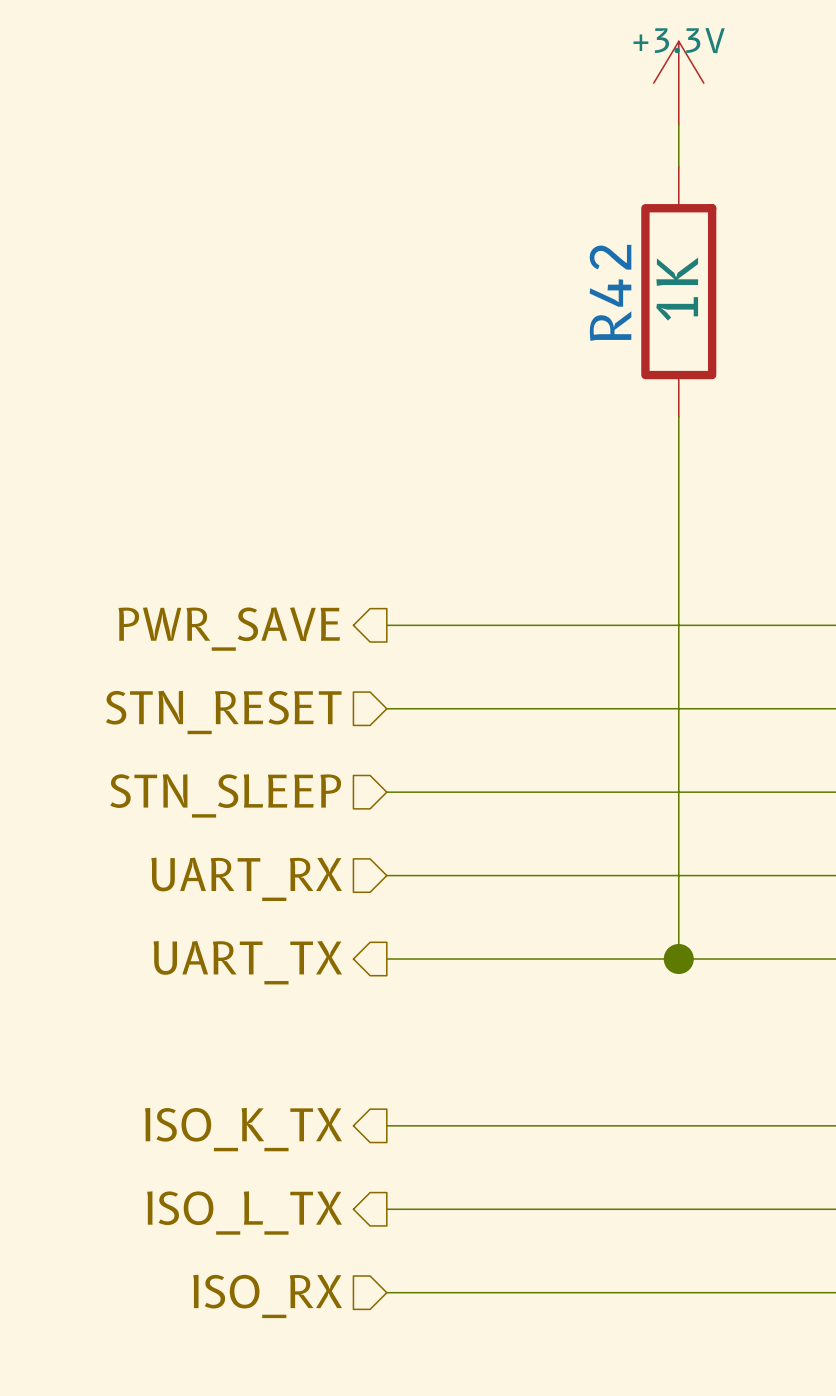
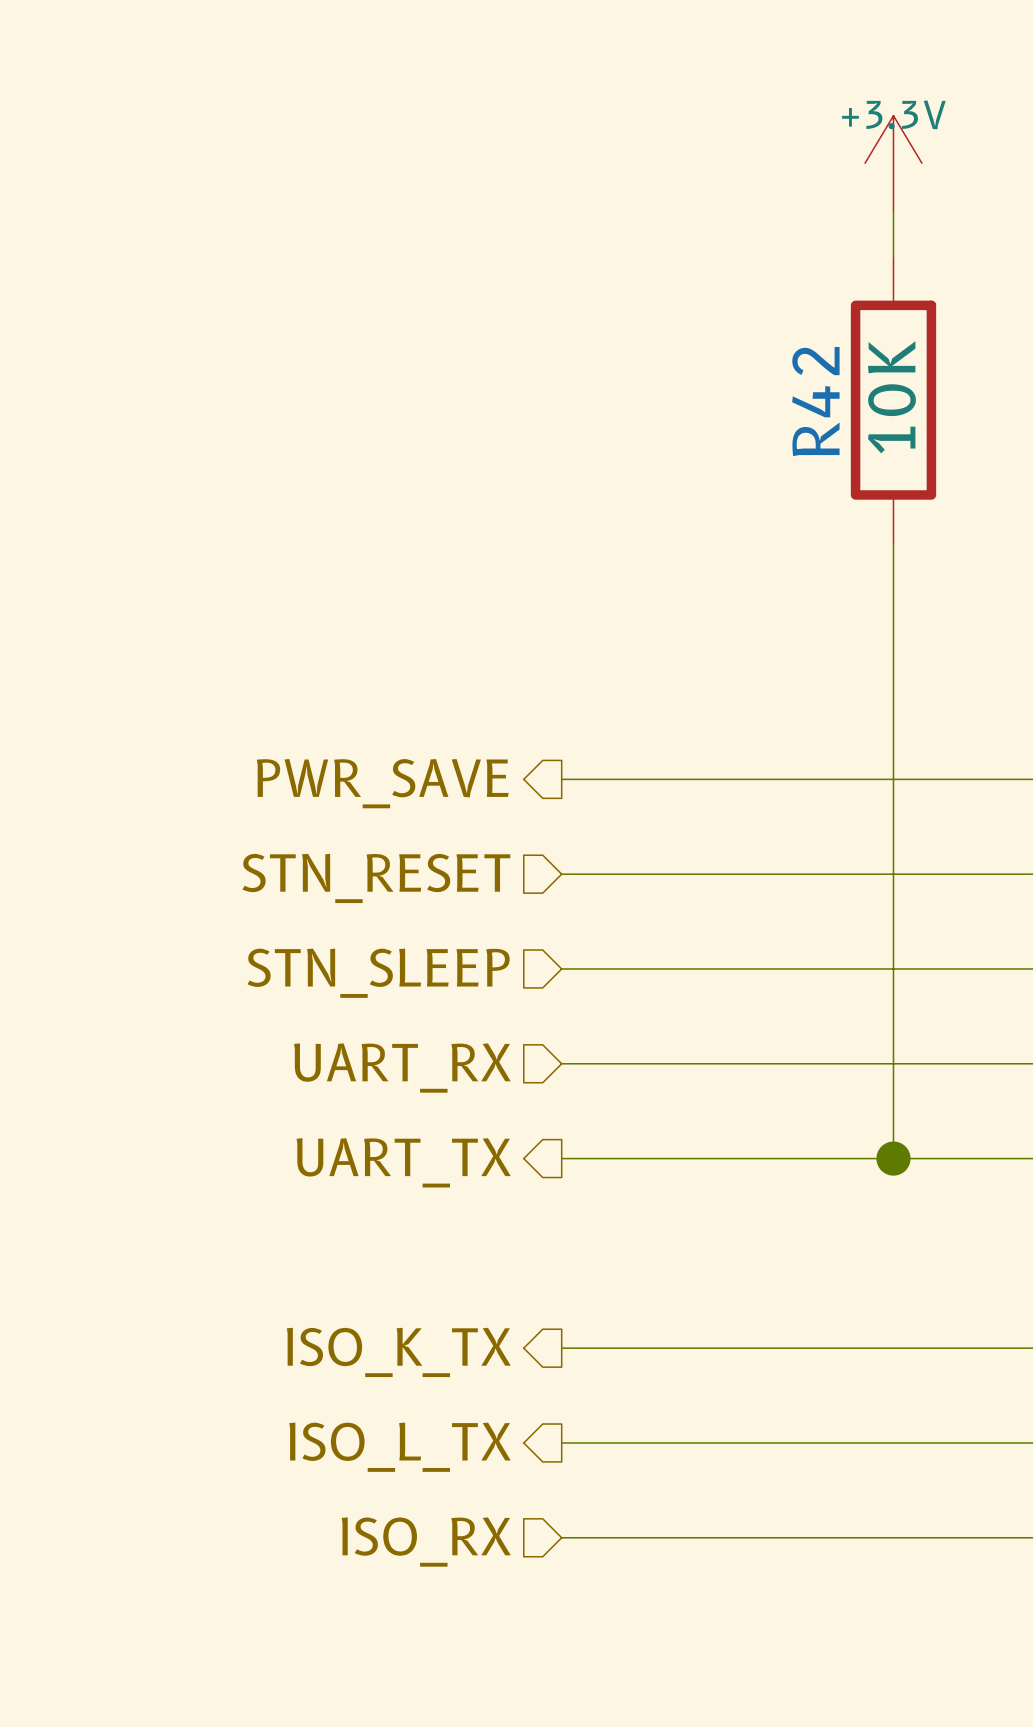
R42 value: 1K (677, 289) -> 10K (891, 397)

